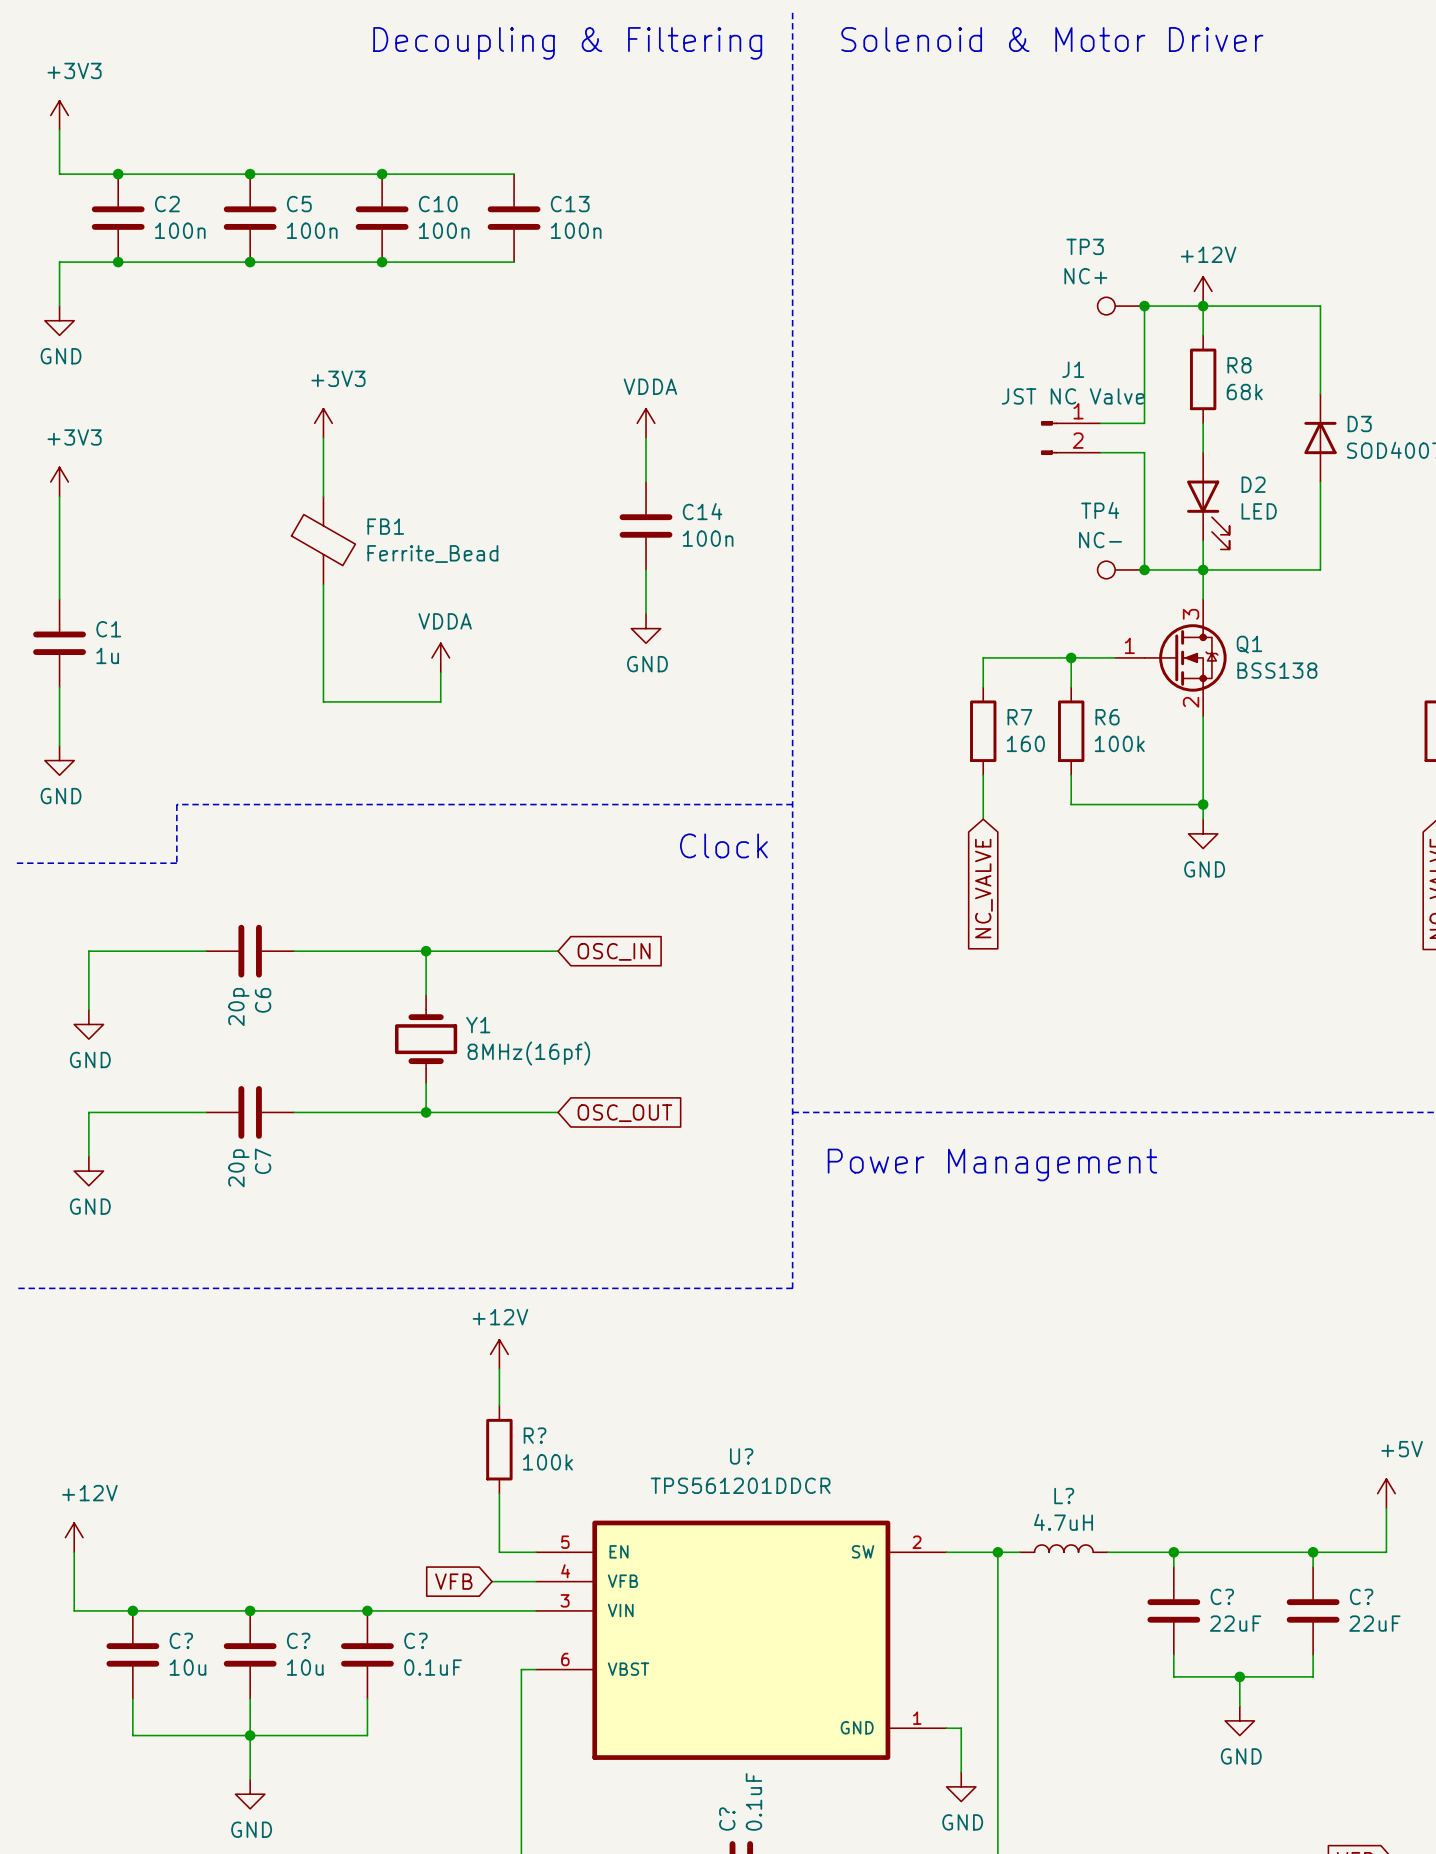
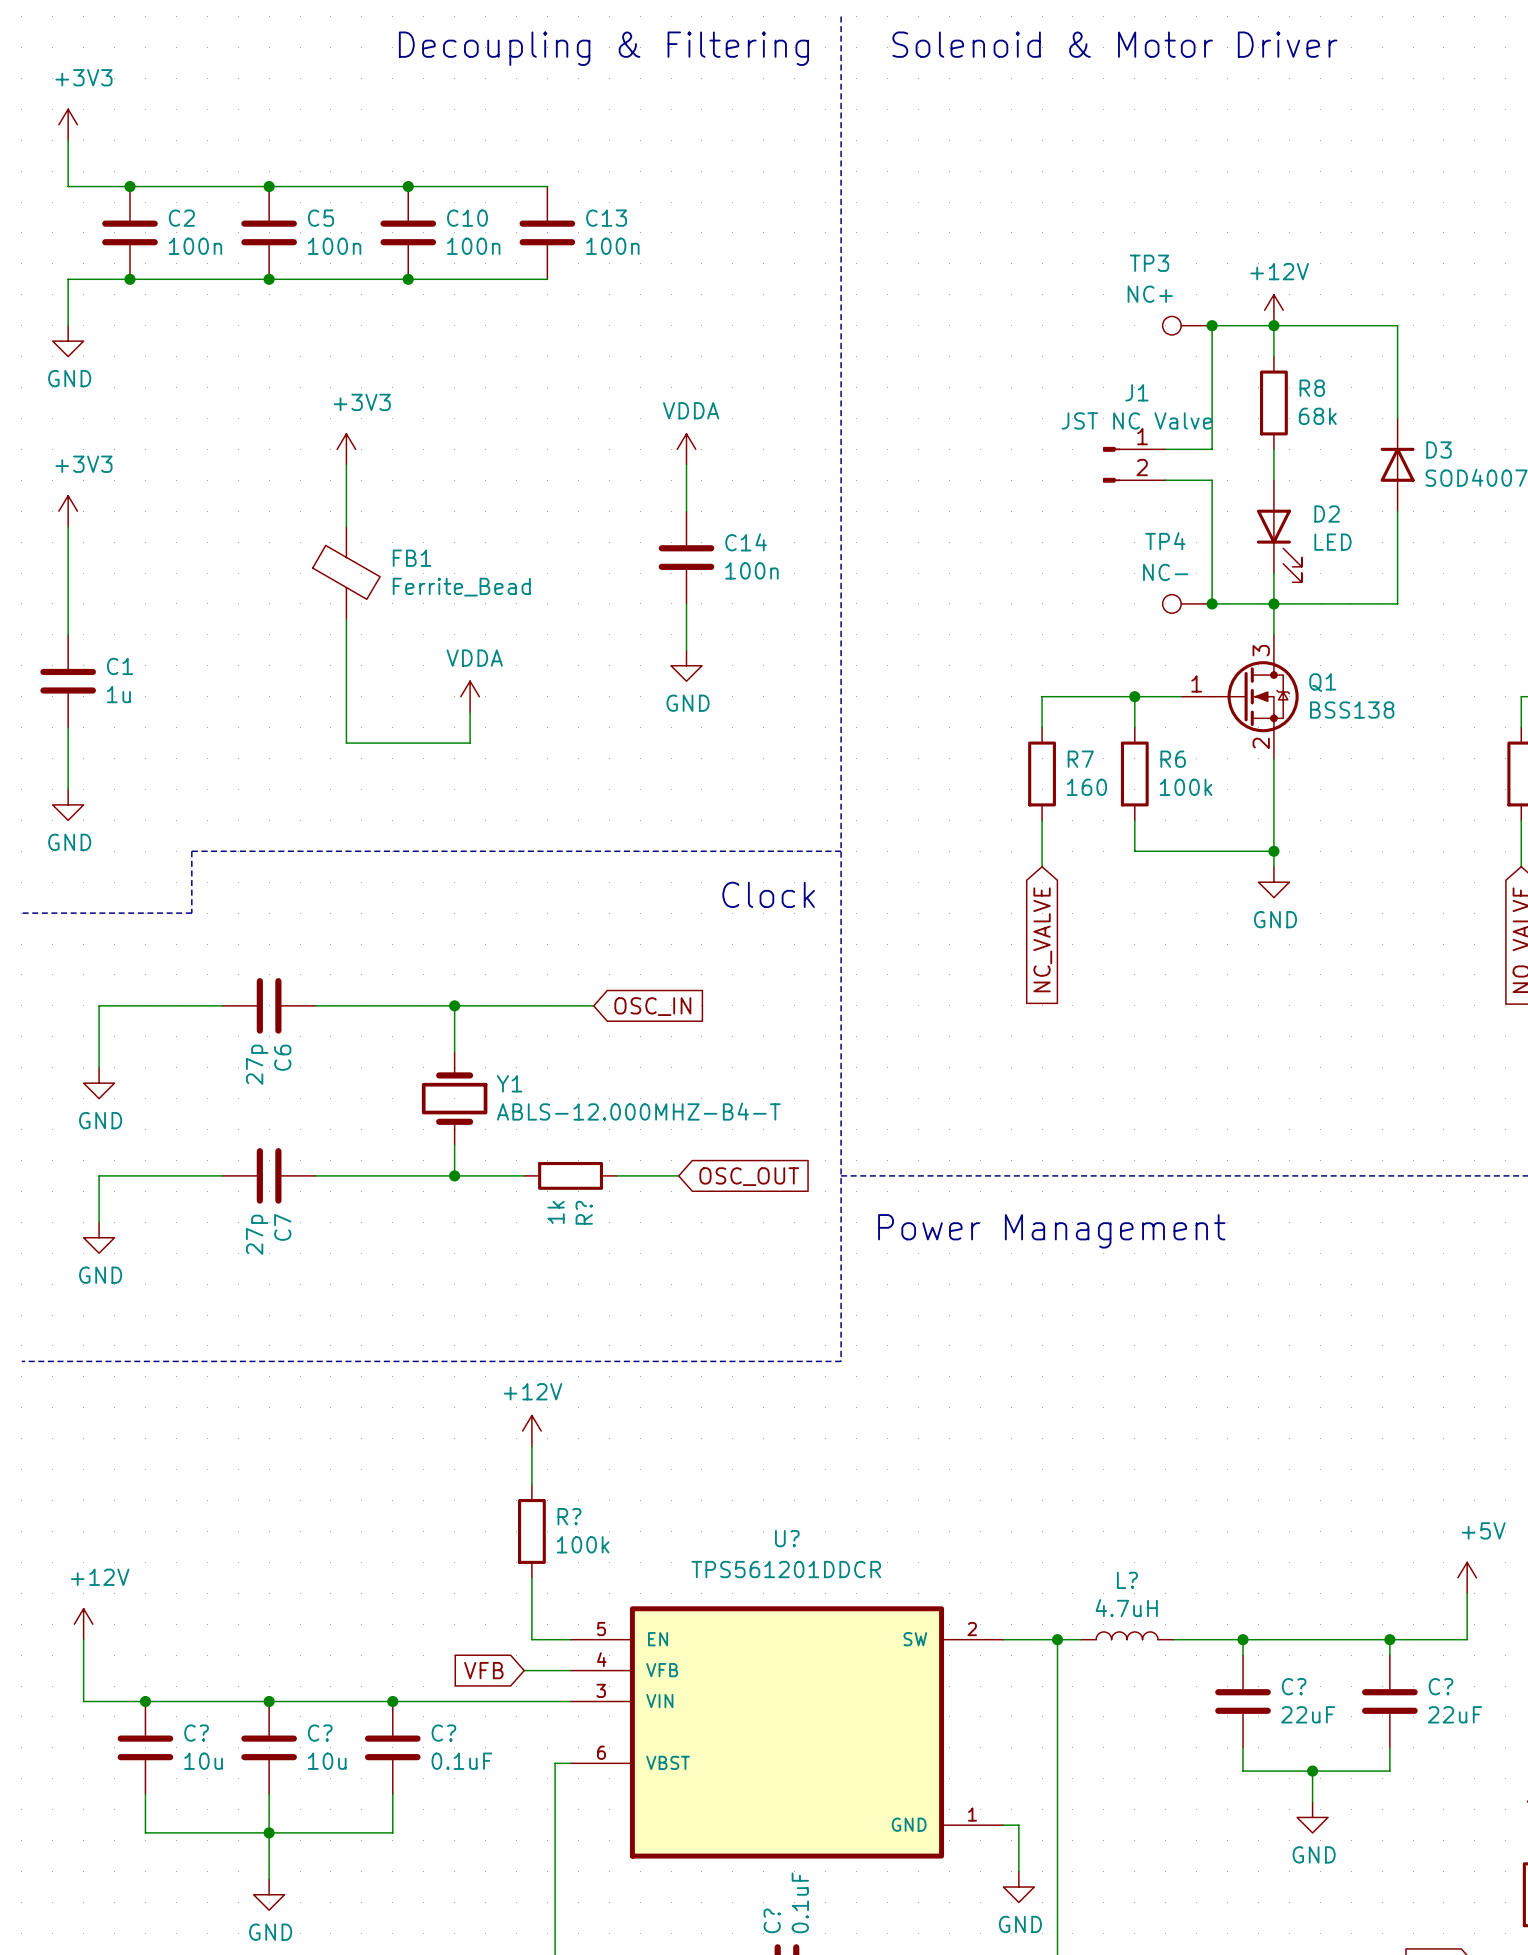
C6 value: 20p (238, 1007) -> 27p (257, 1064)
Y1 value: 8MHz(16pf) (528, 1053) -> ABLS-12.000MHZ-B4-T (638, 1111)
wire: (492, 1112) (558, 1112) -> none
R?: none -> 1k (570, 1175)
wire: none -> (616, 1175) (678, 1175)
global label position: OSC_OUT (624, 1113) -> OSC_OUT (749, 1176)
C7 value: 20p (238, 1168) -> 27p (257, 1234)

